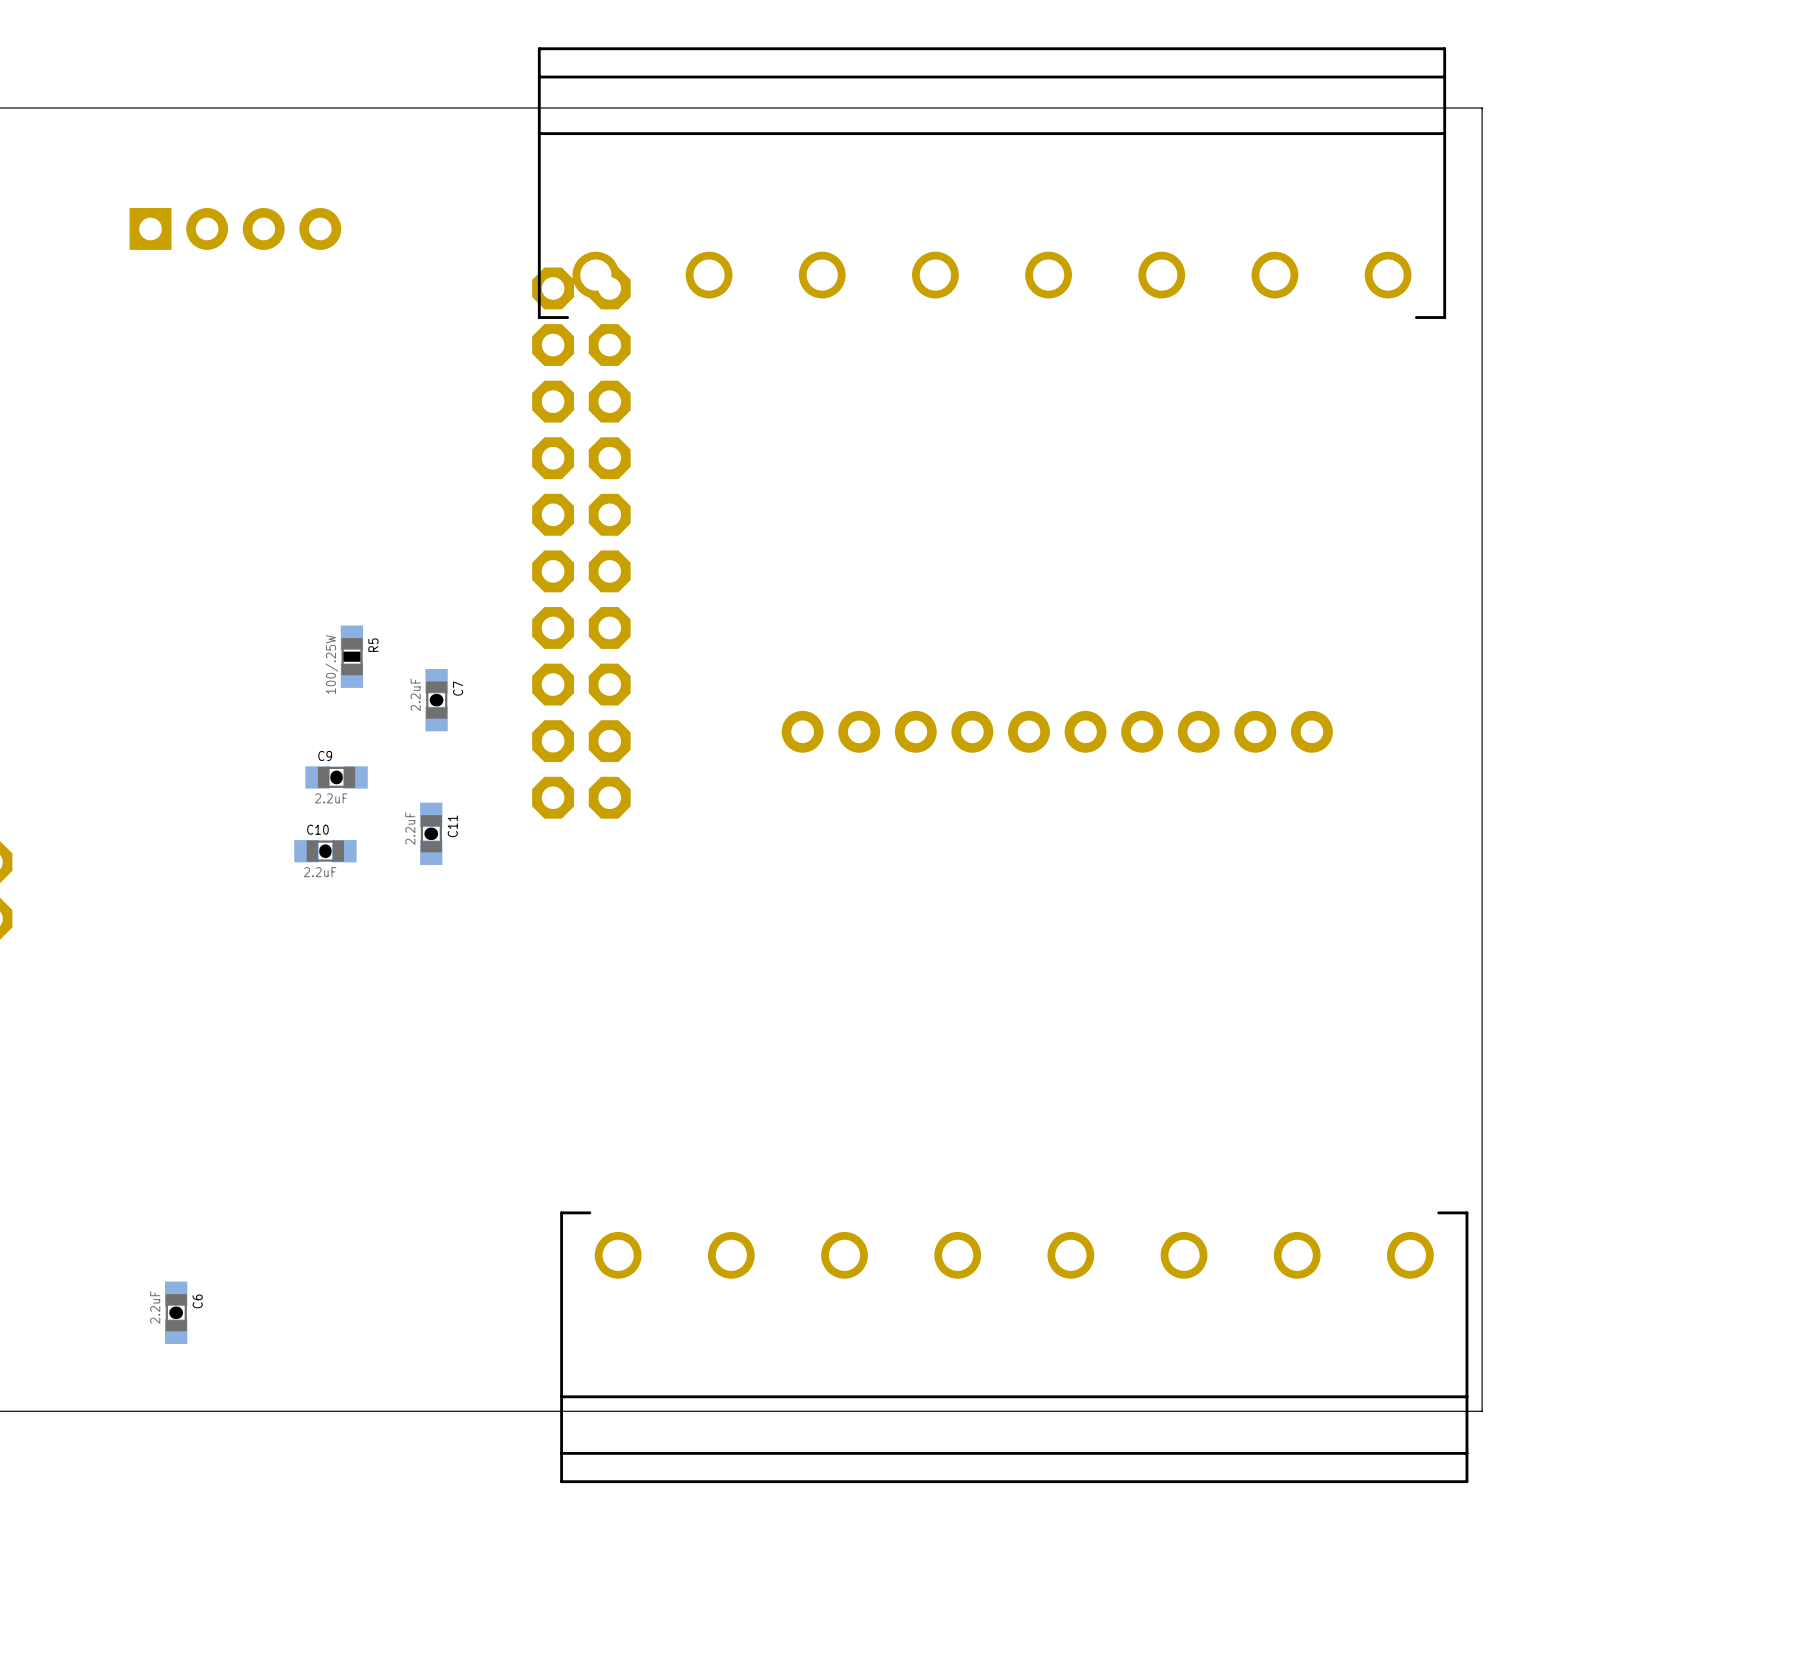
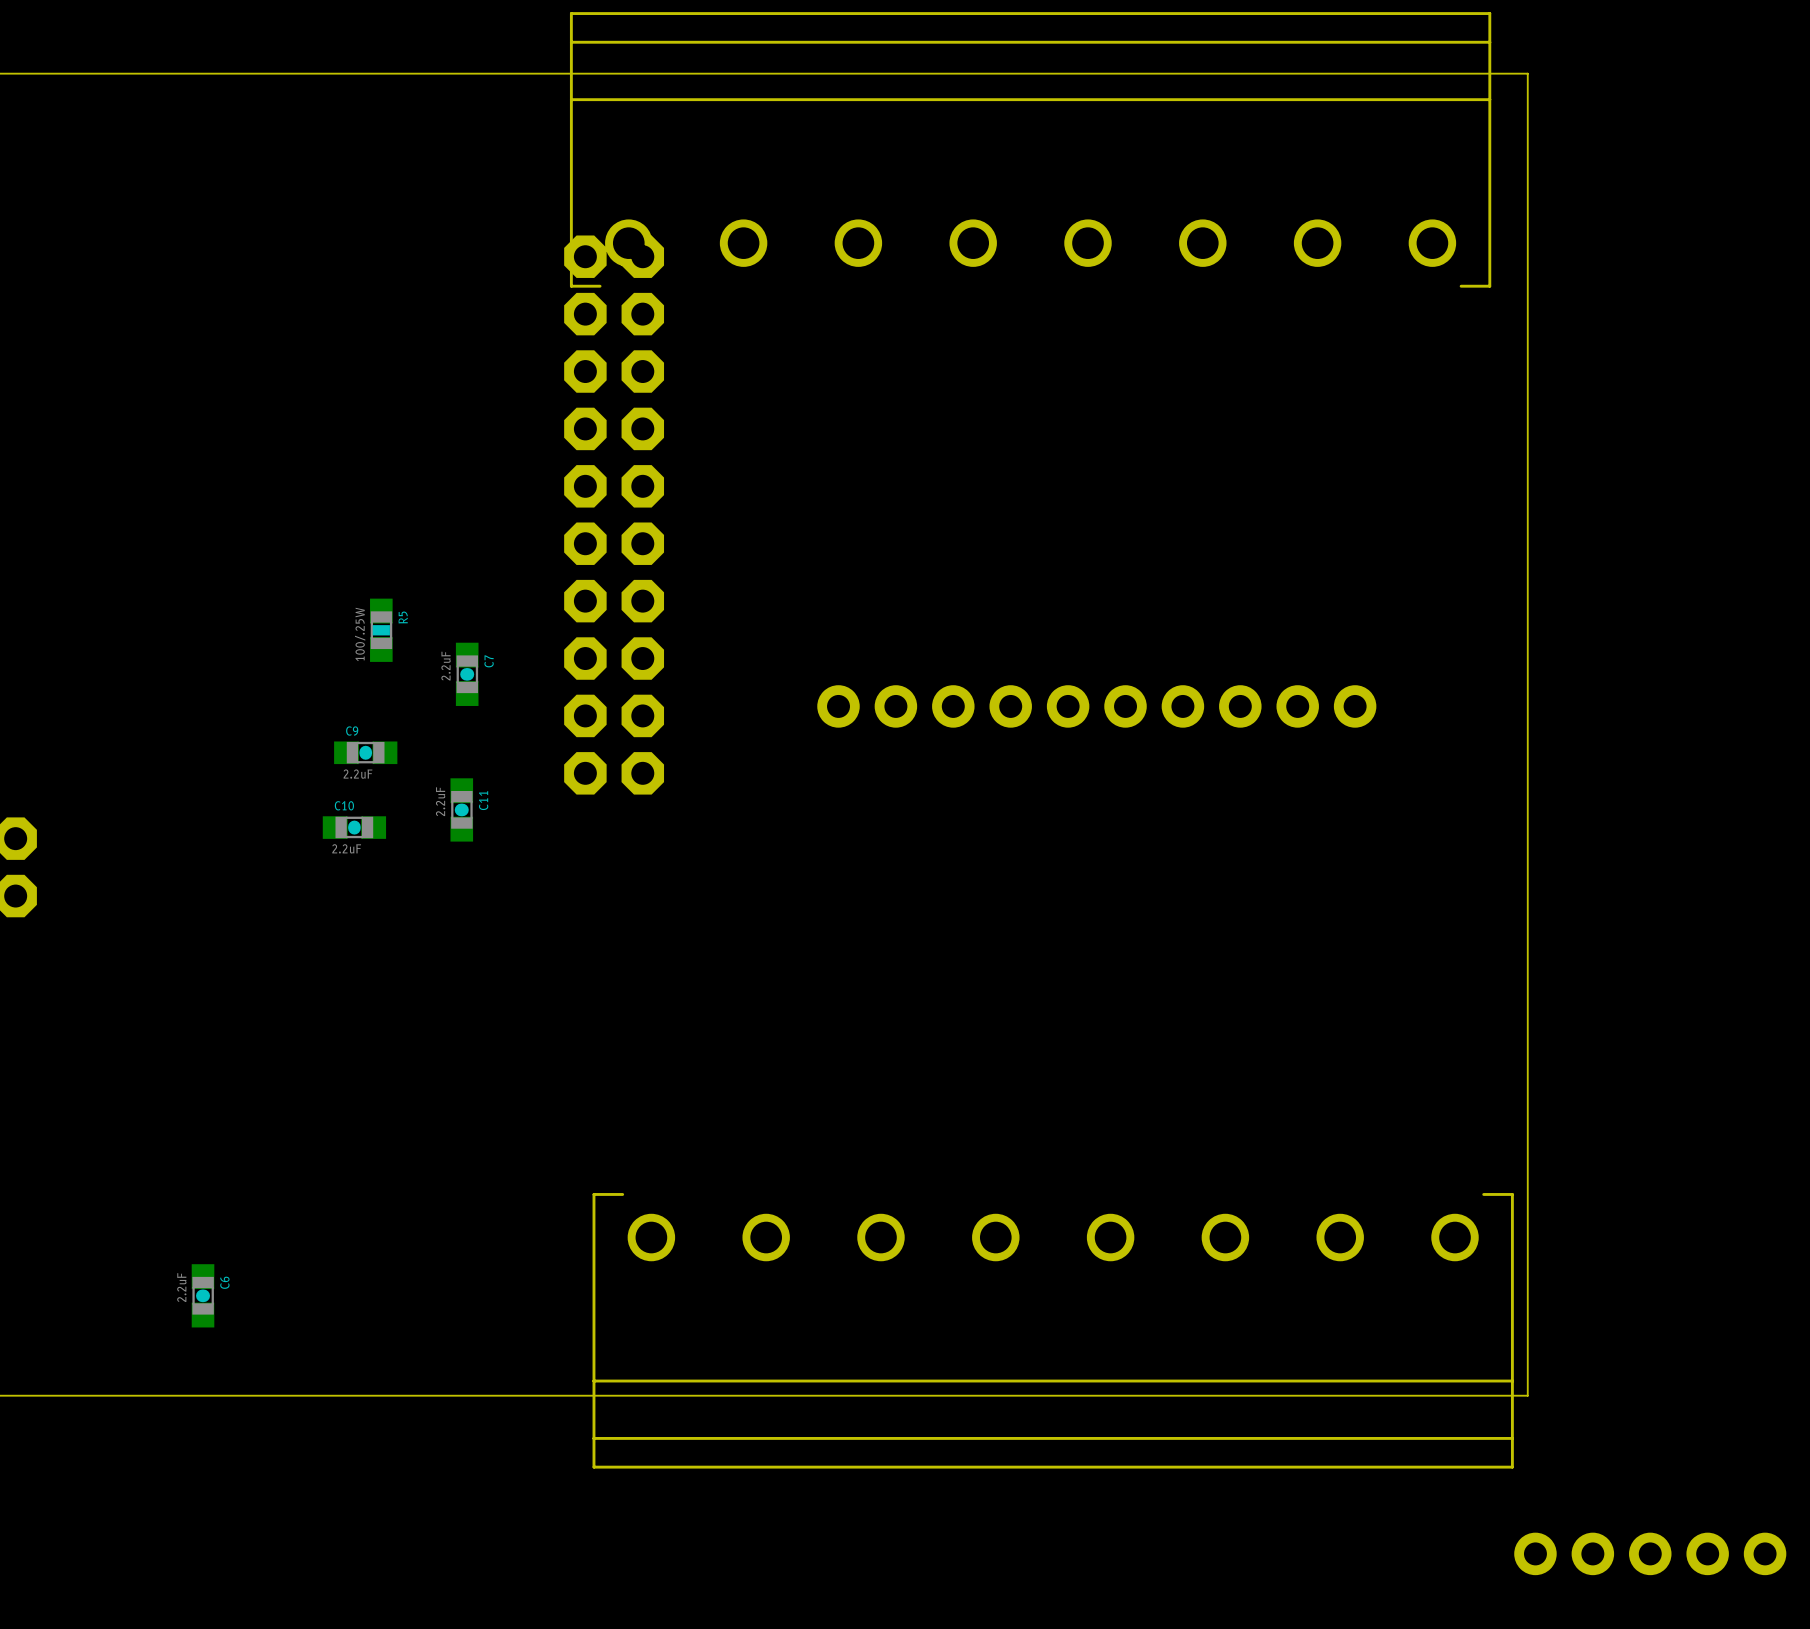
part: (235, 228) -> none
part: none -> (1650, 1553)

